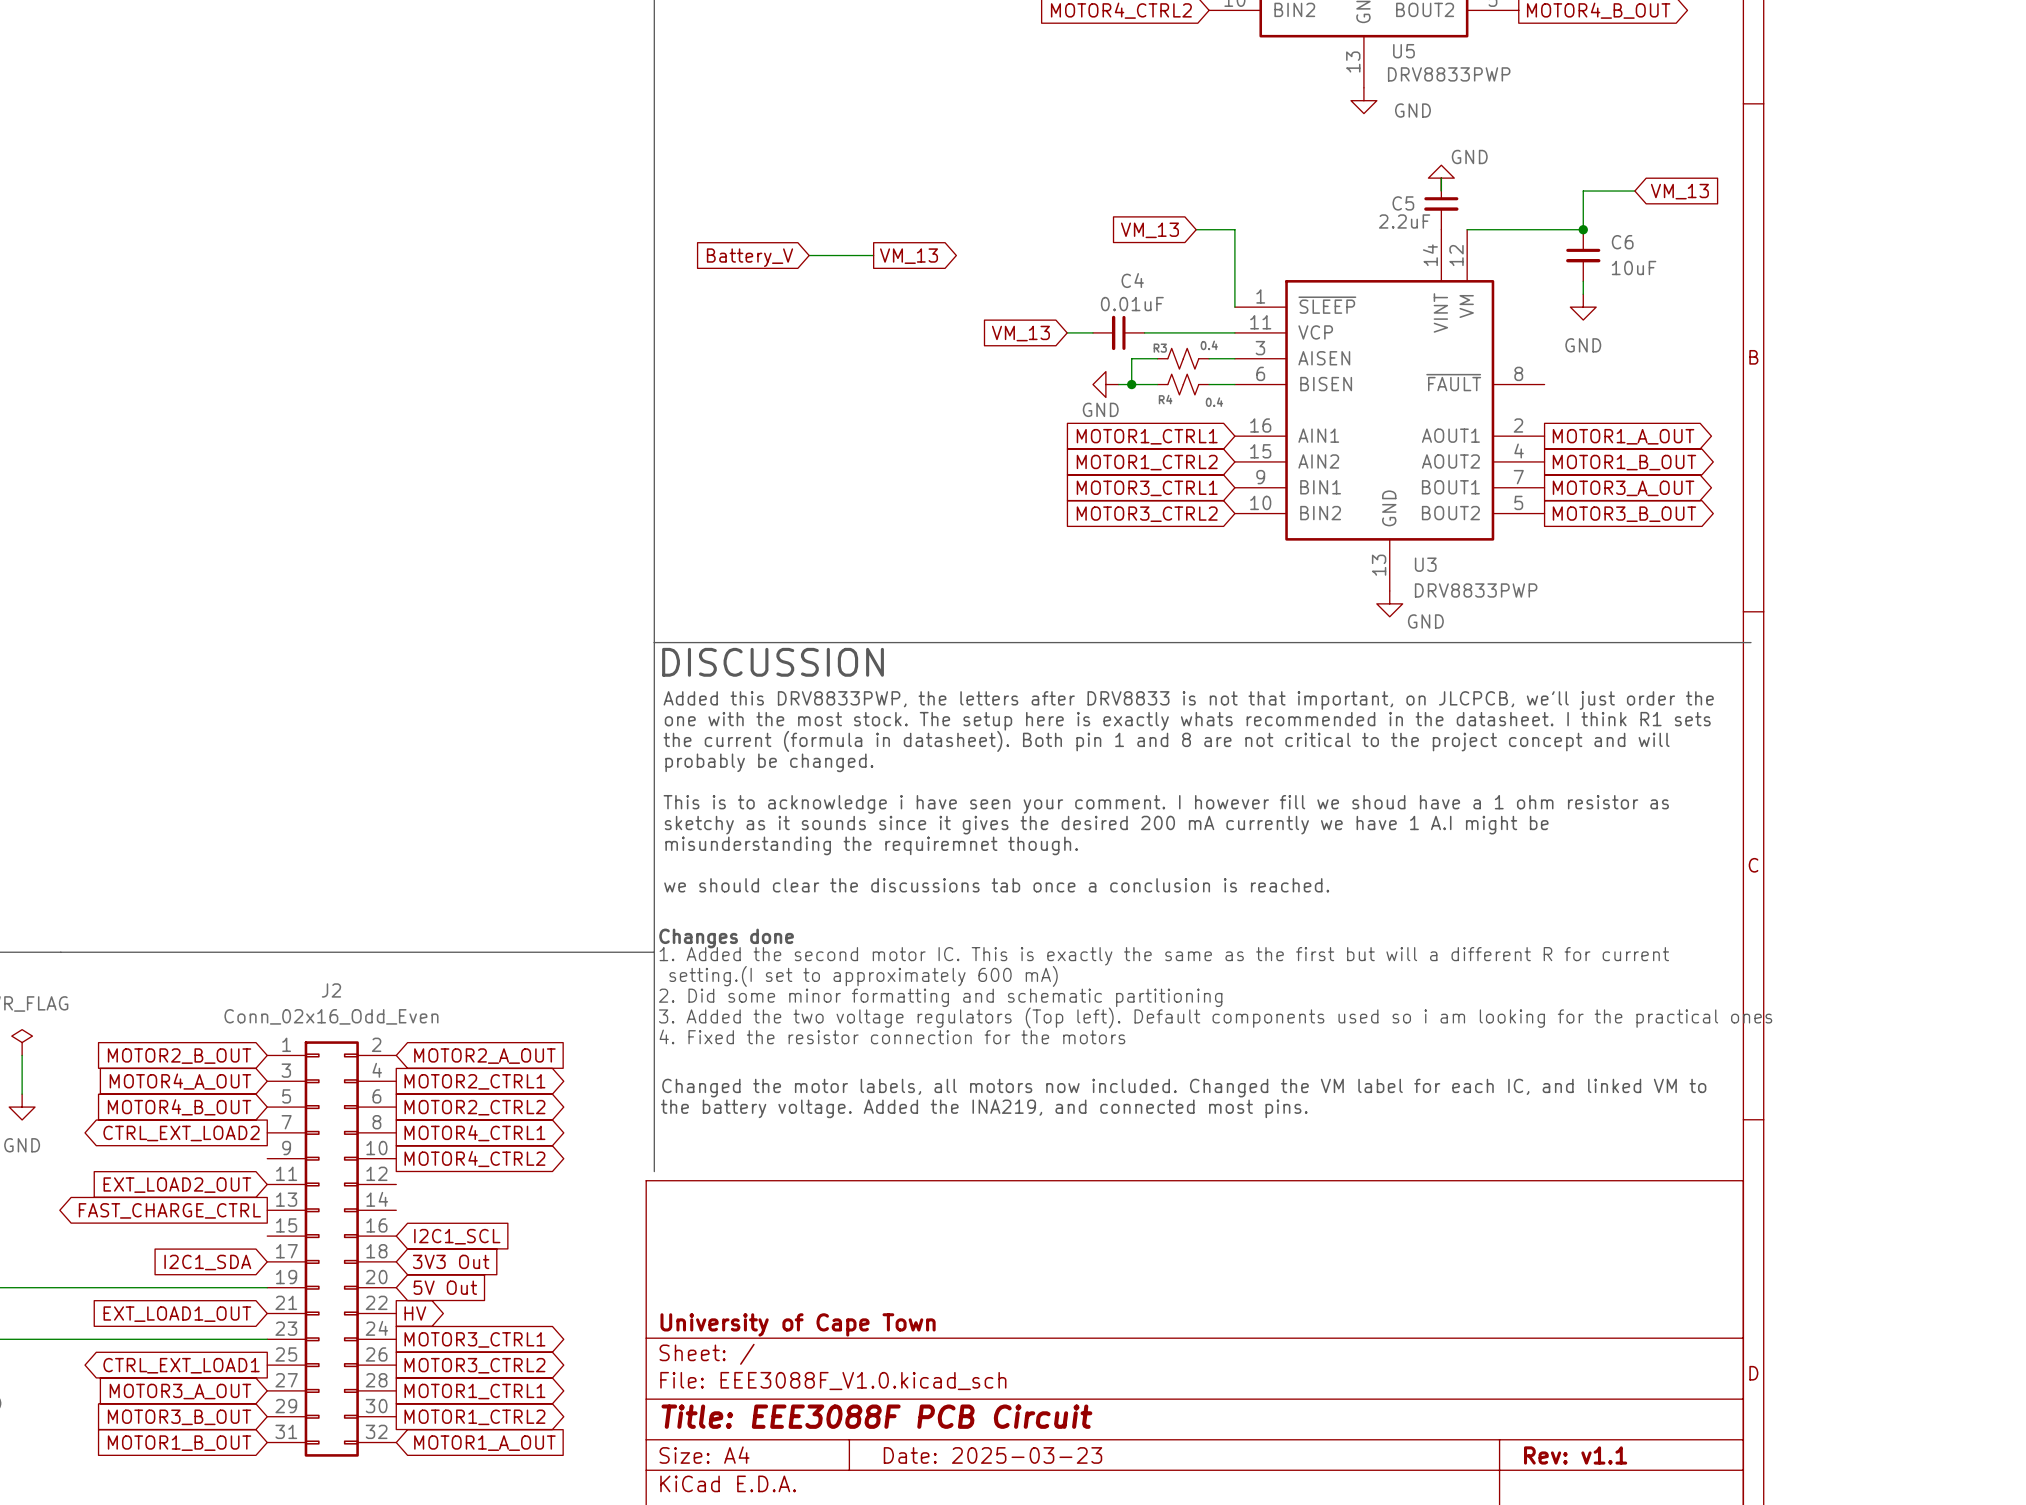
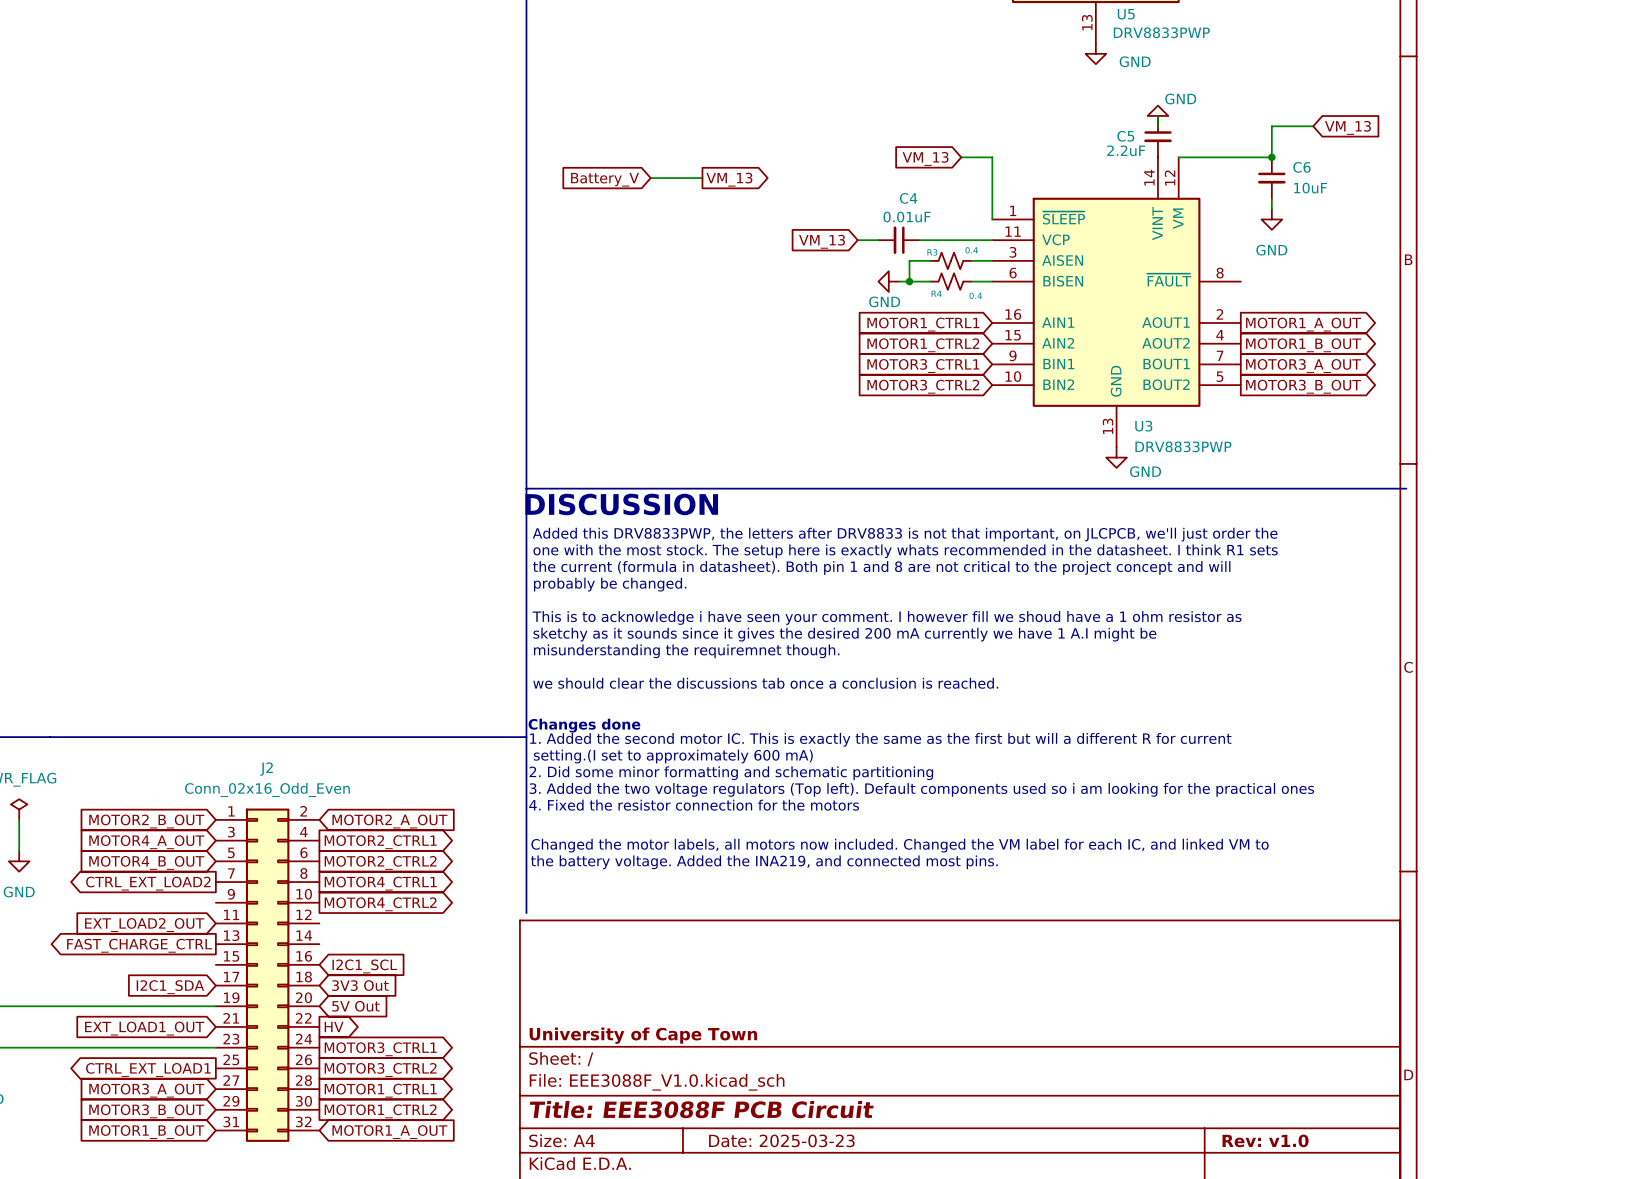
title block: Rev: v1.1 (1575, 1455) -> Rev: v1.0 (1265, 1140)

